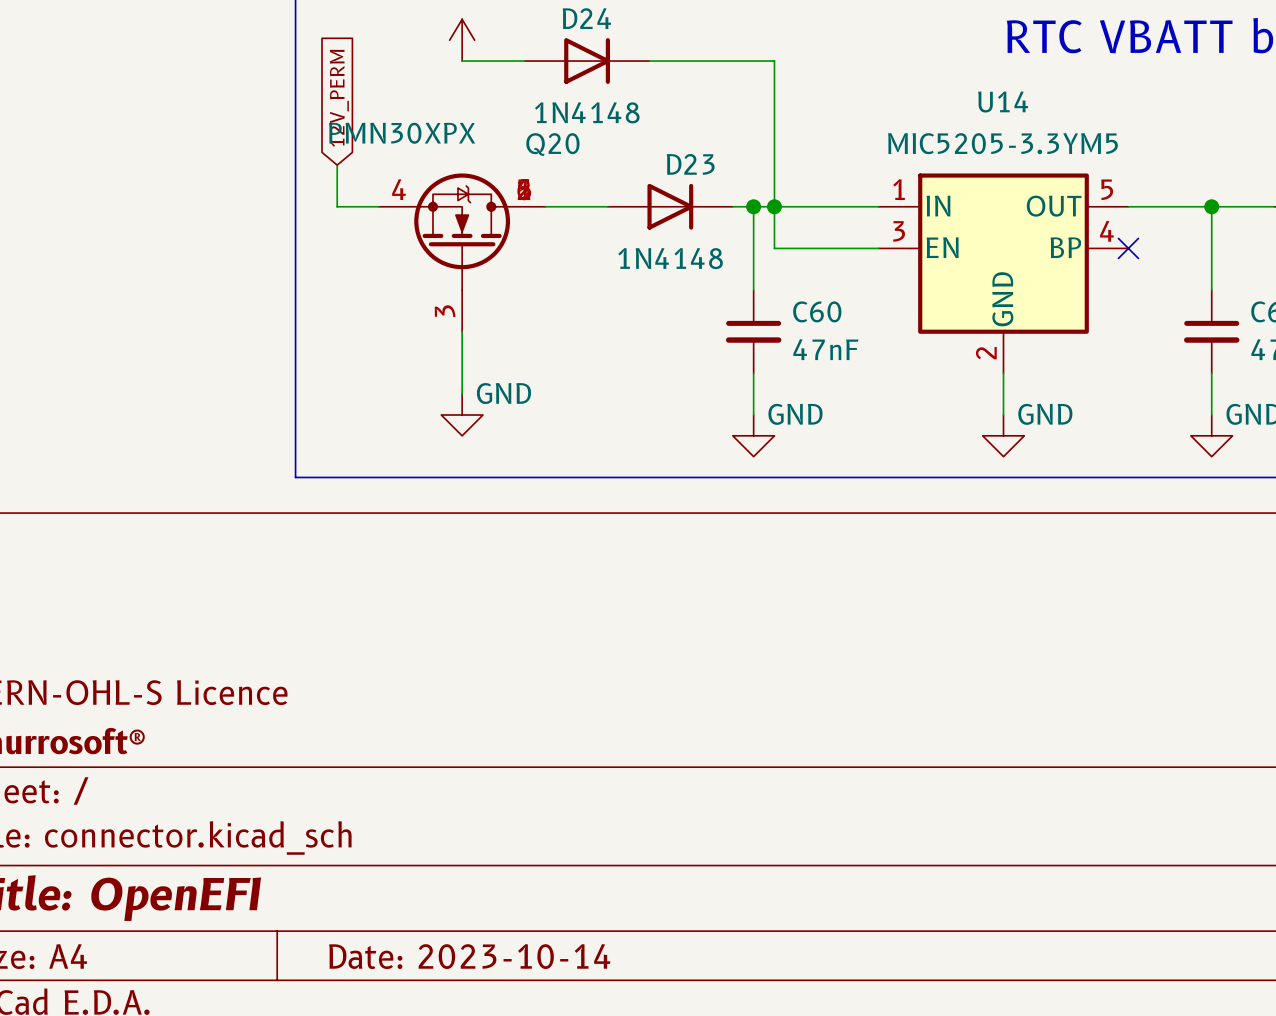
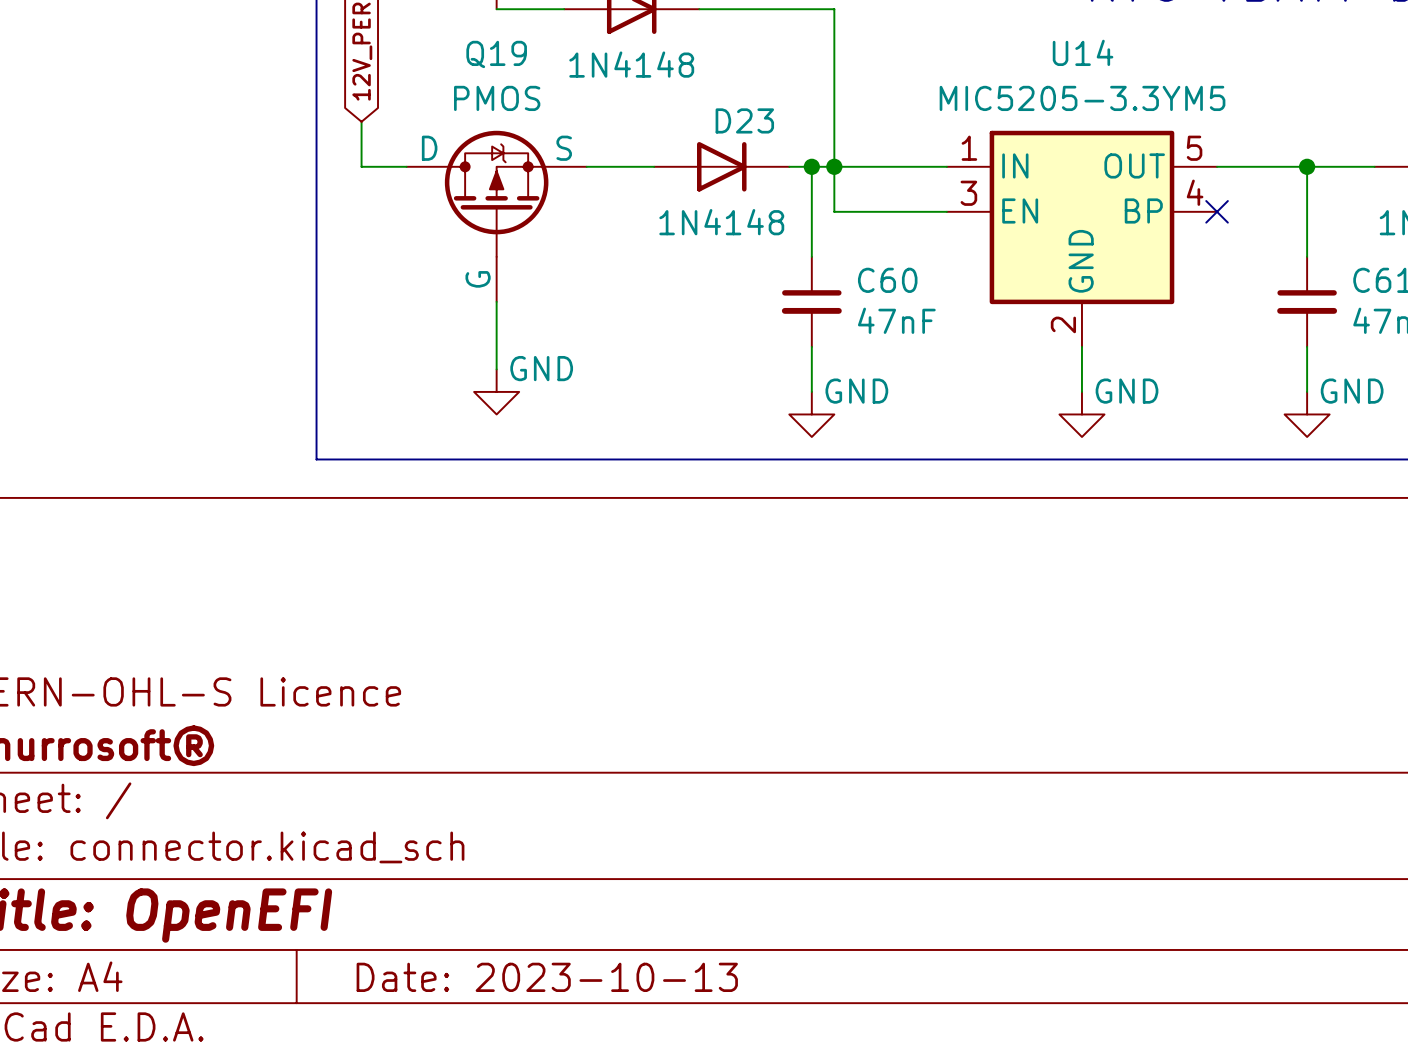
Q20: PMN30XPX (462, 252) -> none
Q19: none -> PMOS (496, 216)
title block: Date: 2023-10-14 (469, 956) -> Date: 2023-10-13 (547, 977)

